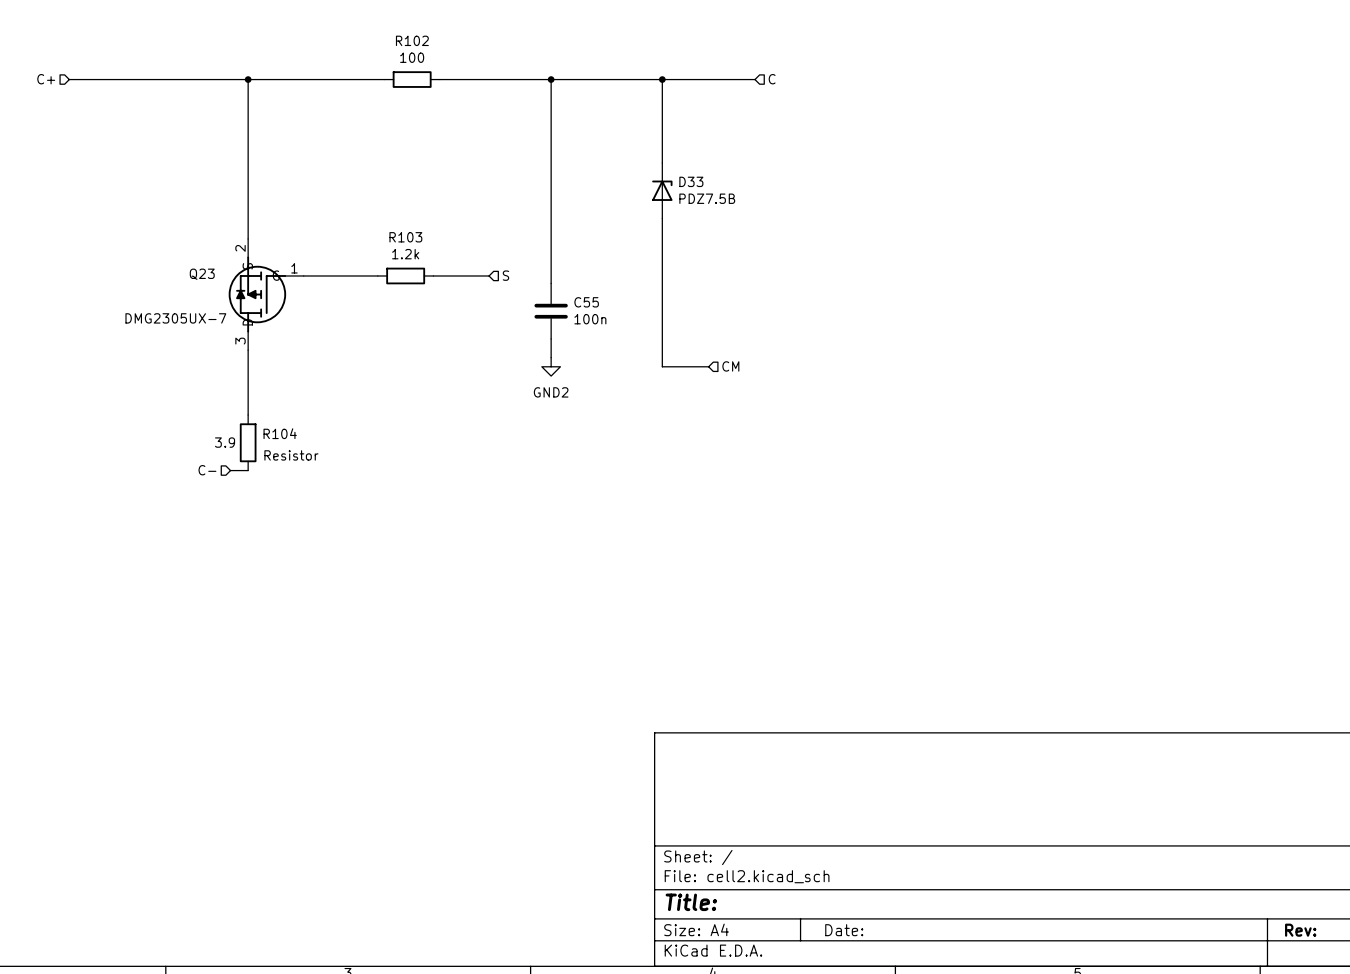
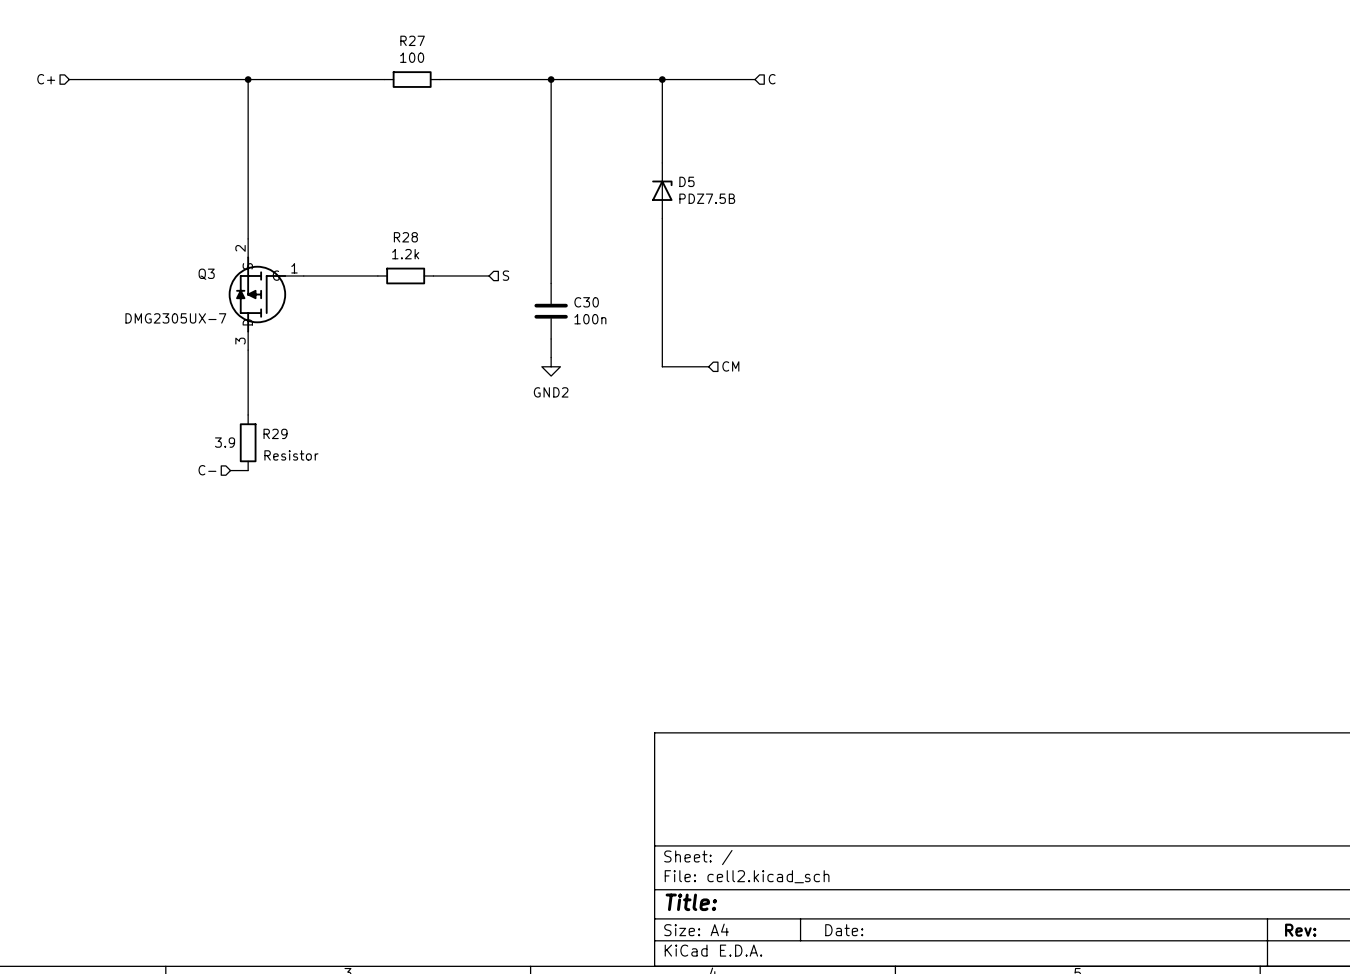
R102 name: R102 (412, 40) -> R27 (412, 40)
D33 name: D33 (691, 181) -> D5 (686, 181)
R103 name: R103 (405, 237) -> R28 (405, 237)
Q23 name: Q23 (202, 274) -> Q3 (206, 274)
C55 name: C55 (586, 302) -> C30 (586, 302)
R104 name: R104 (280, 433) -> R29 (275, 433)

